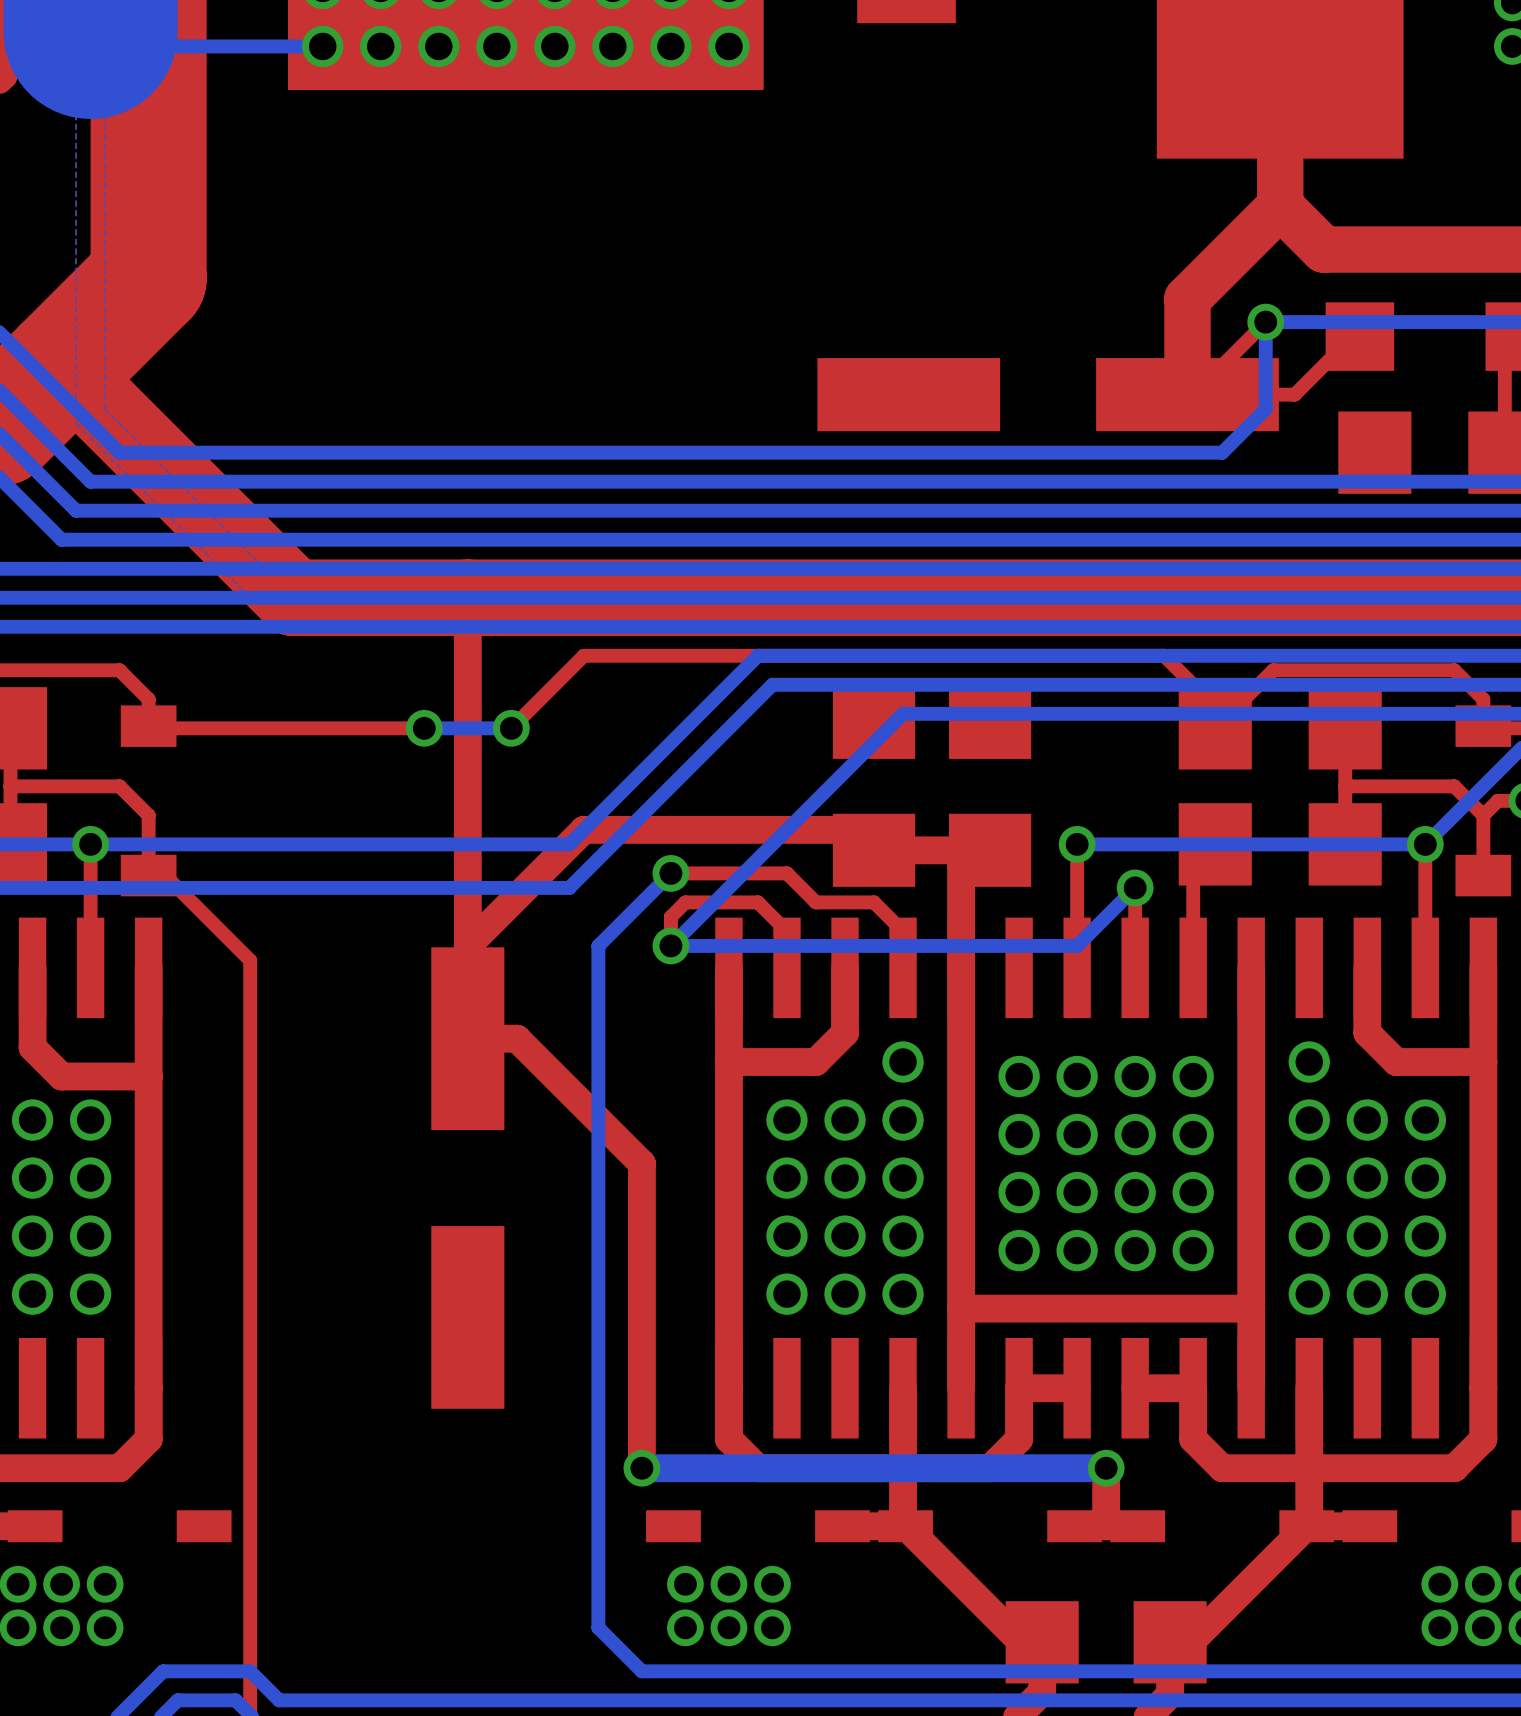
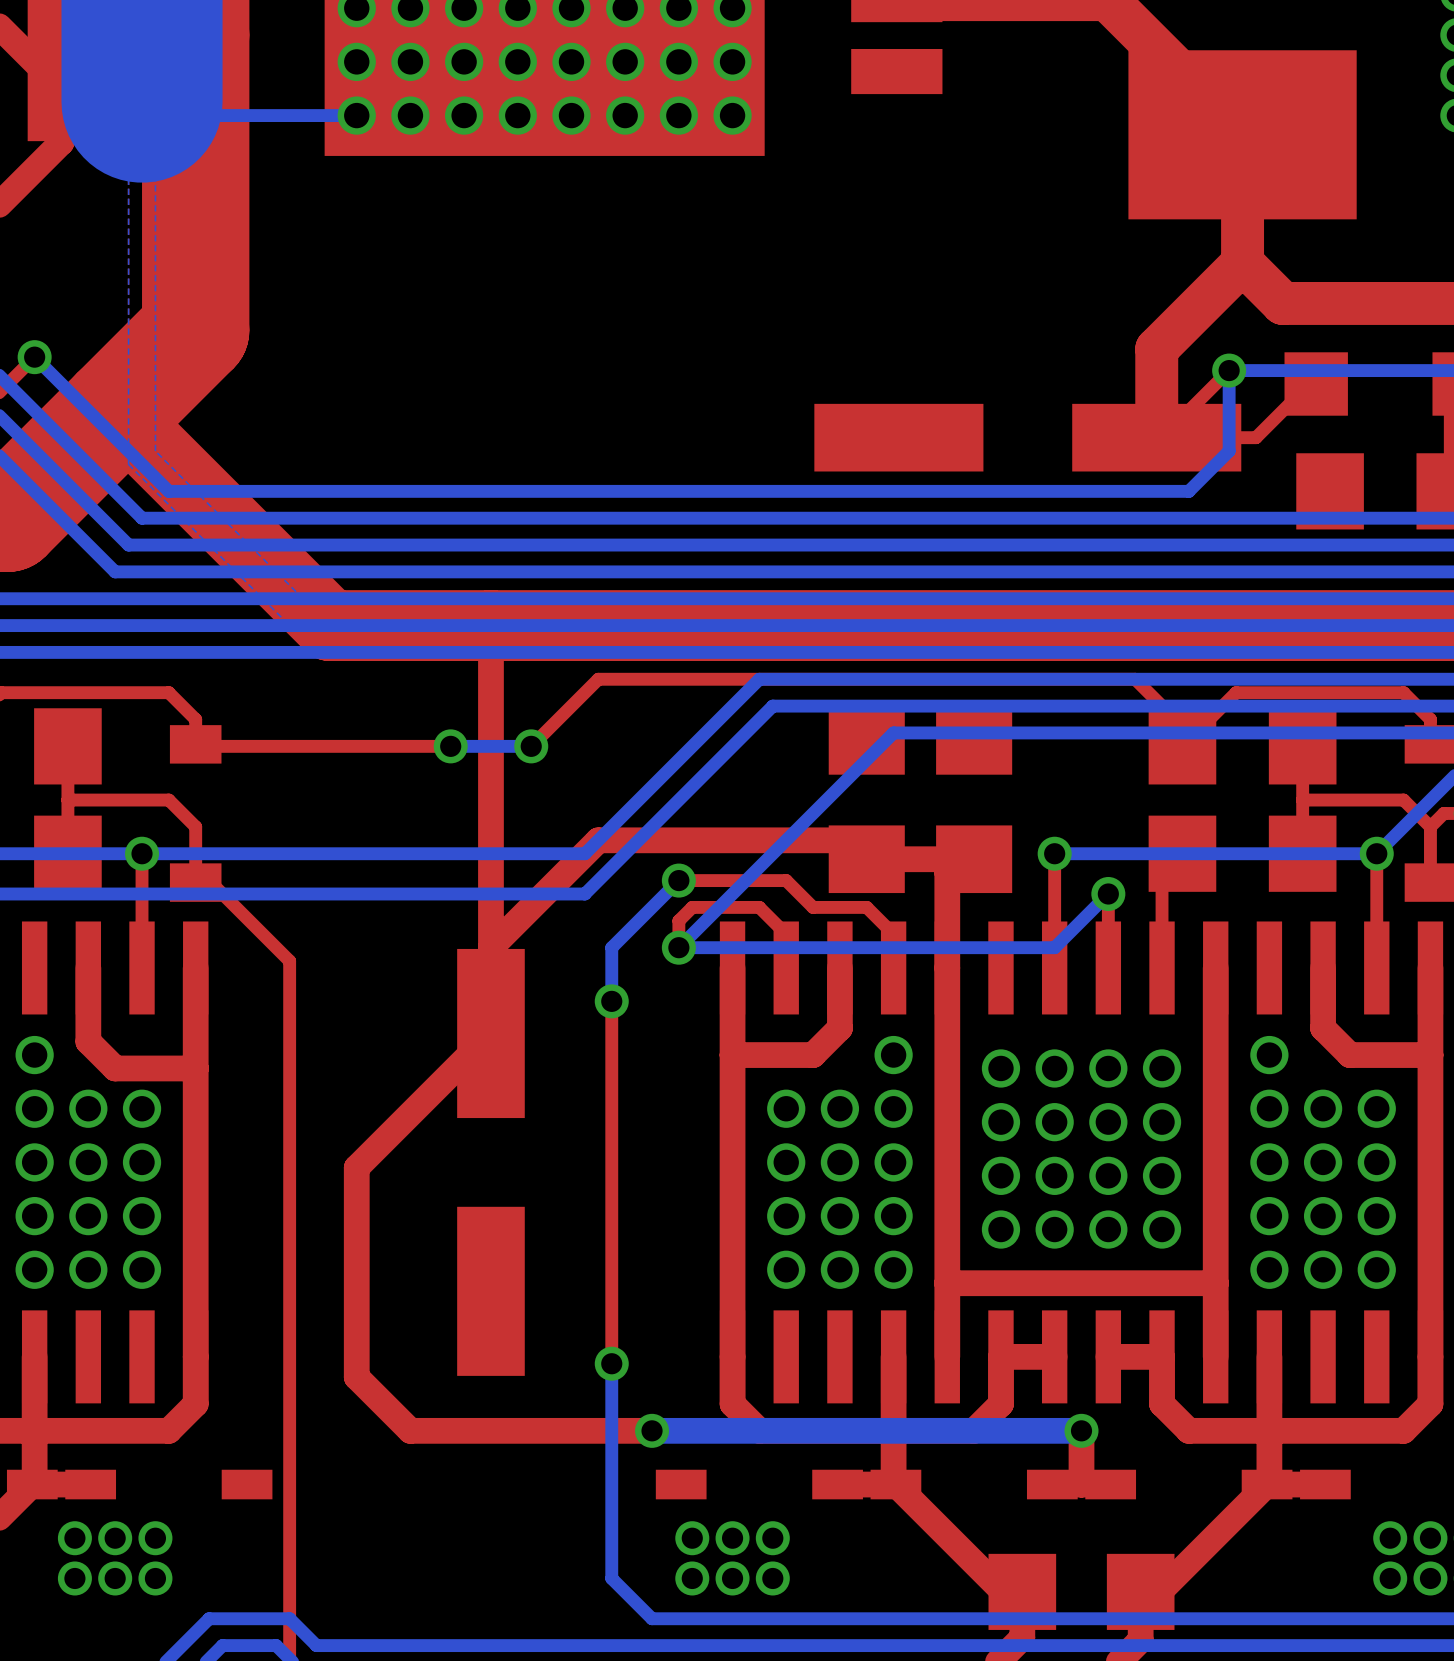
top track: none -> (611, 1001) (611, 1363)
bottom track: (598, 1003) (598, 1395) -> none
via: none -> (611, 1001)
top track: (467, 1038) (517, 1038) (641, 1163) (641, 1468) -> (490, 1033) (356, 1167) (356, 1377) (410, 1430) (652, 1430)
via: none -> (611, 1363)

